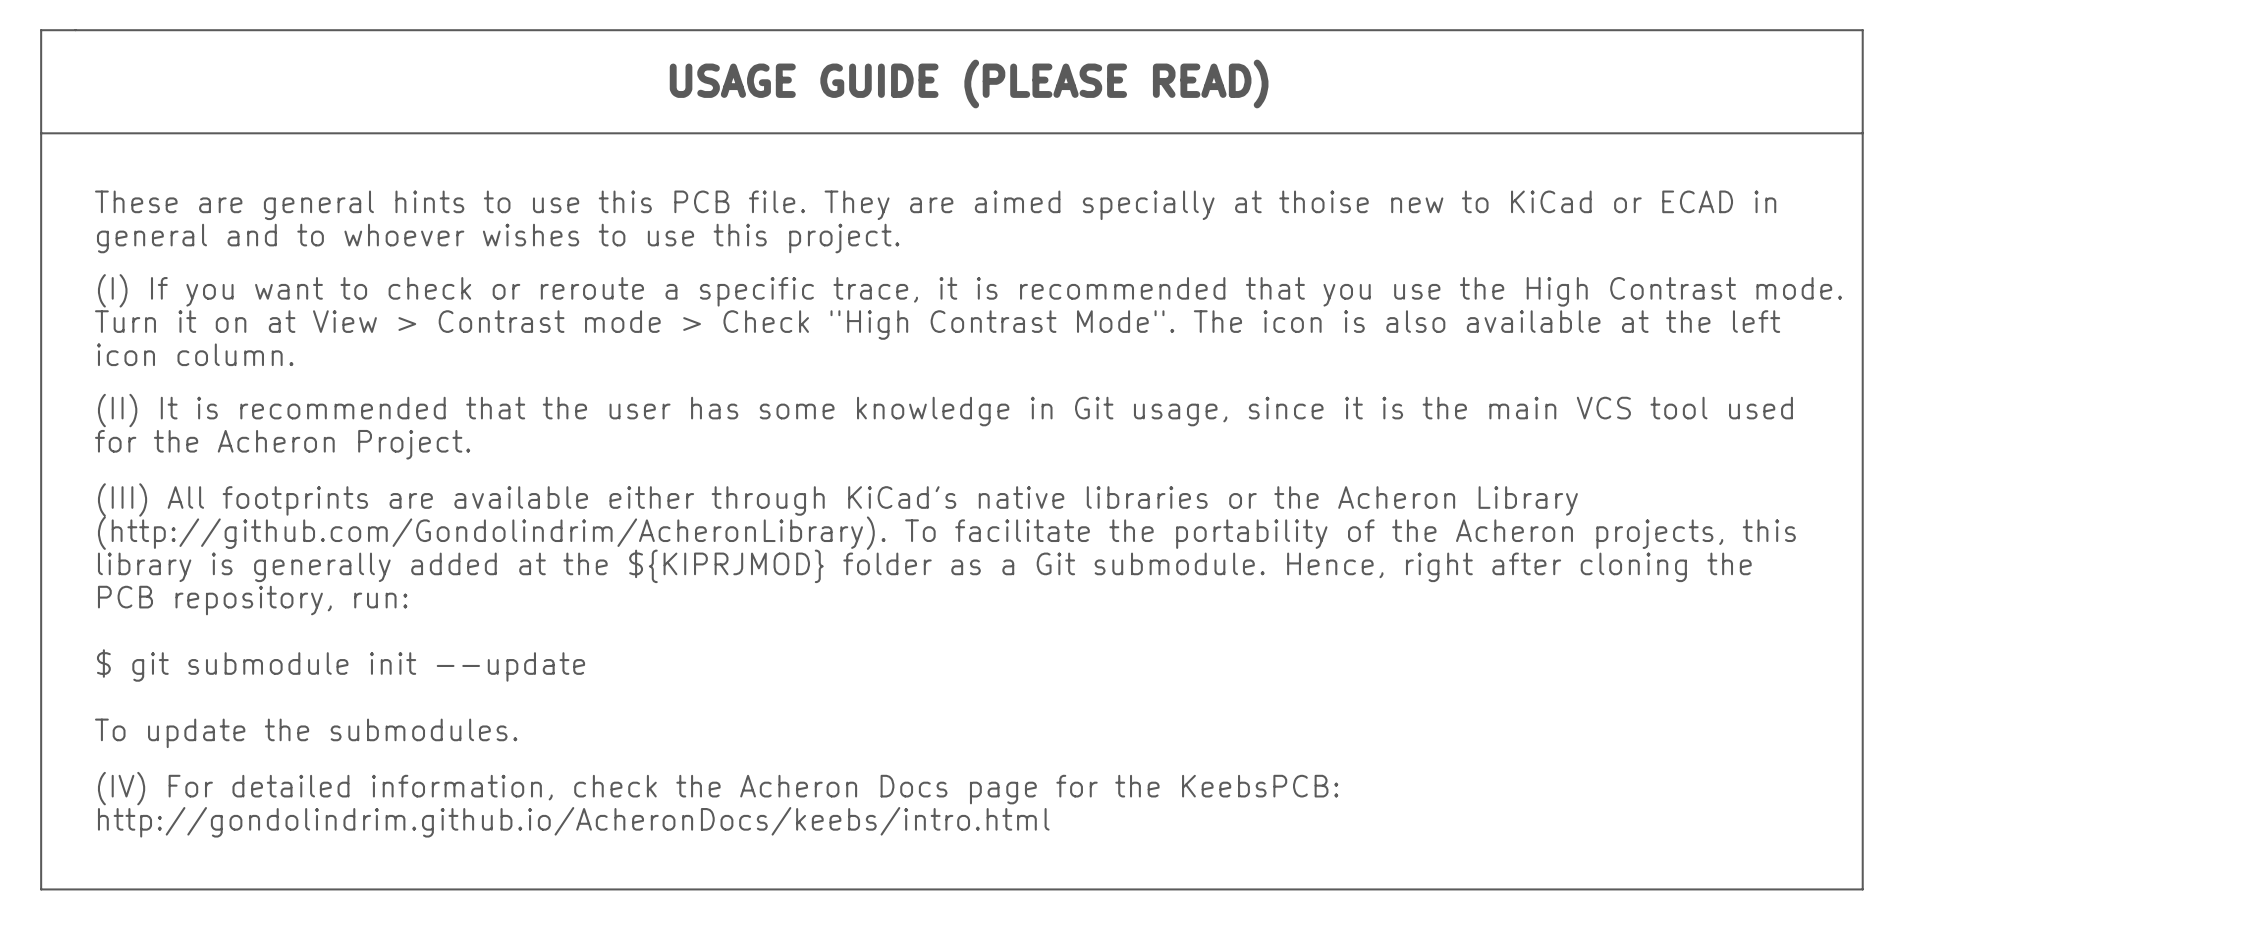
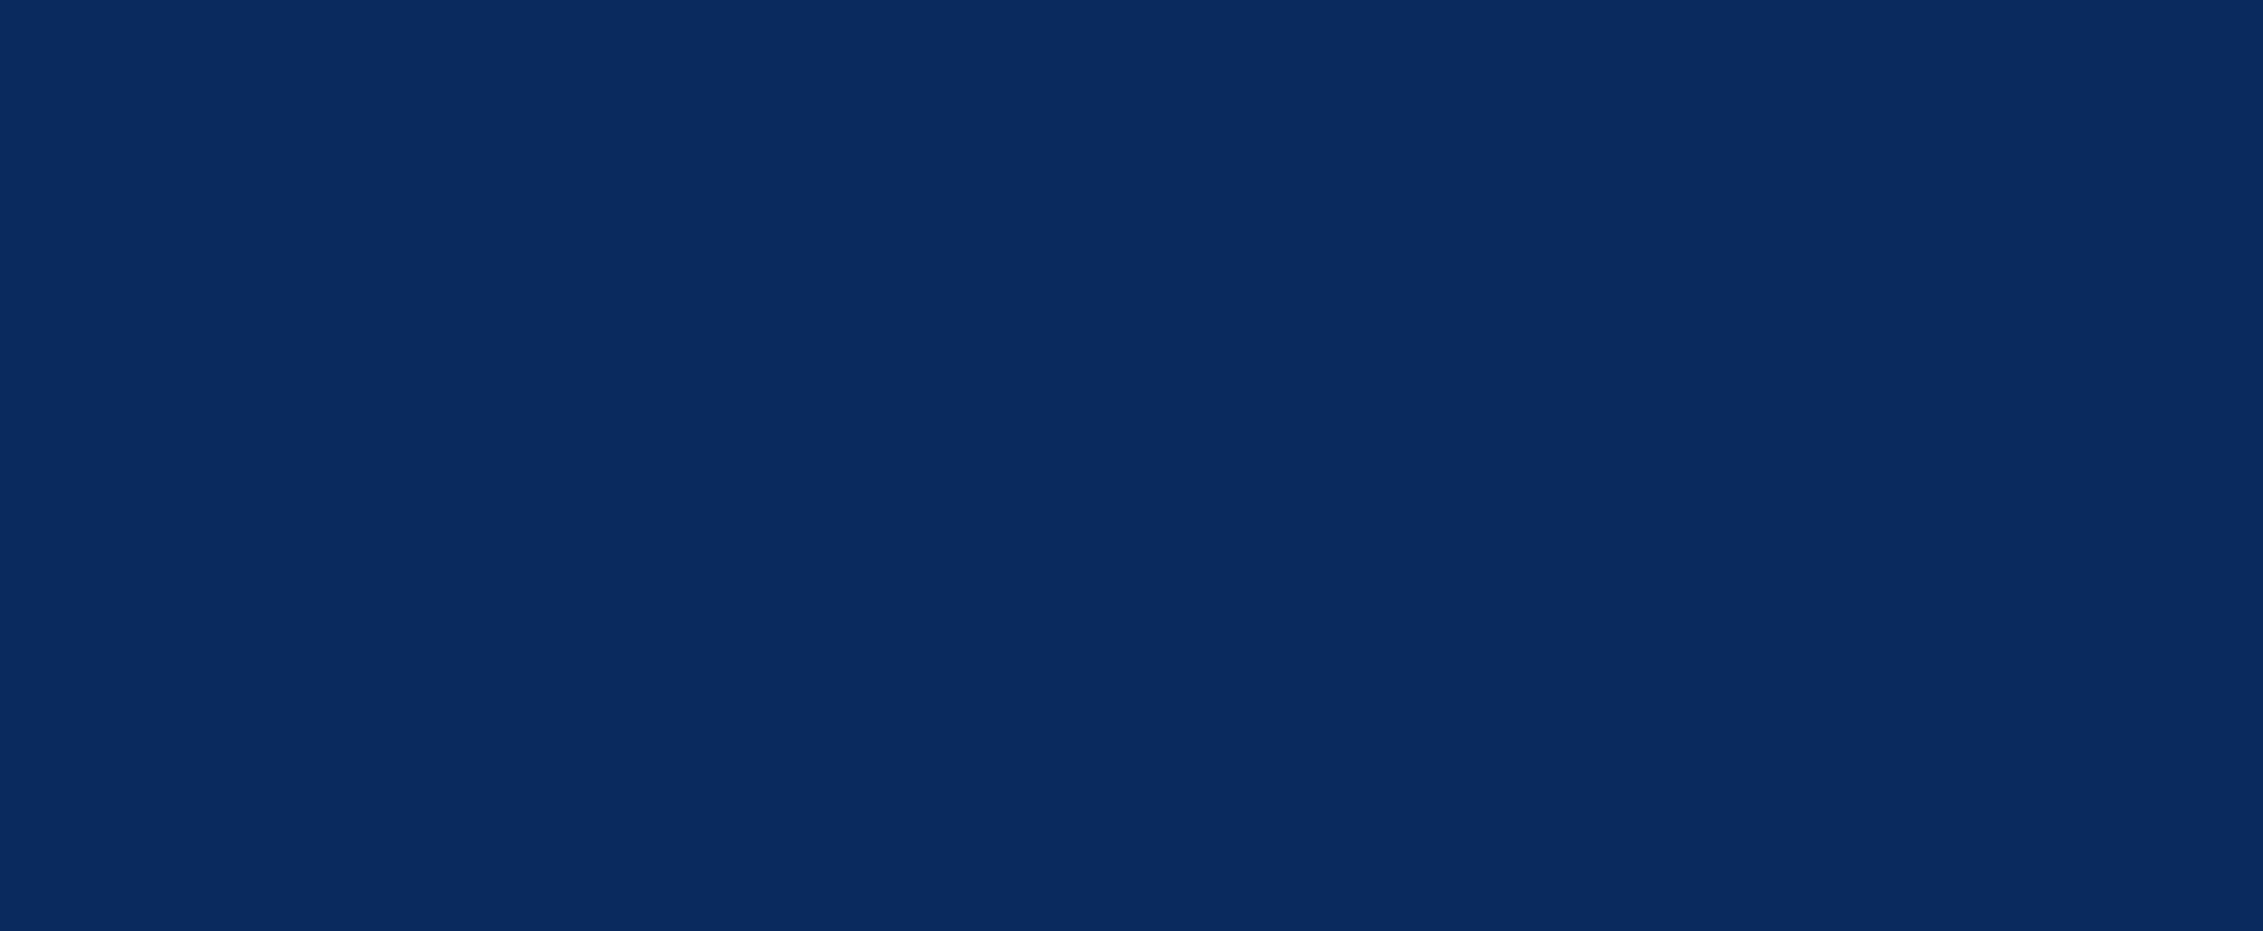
line: (41, 30) (1862, 30) (1862, 889) (41, 889) (41, 30) -> none
text: USAGE GUIDE (PLEASE READ) (969, 84) -> none
line: (41, 133) (1862, 133) -> none
text: These are general hints to use this PCB file. They are aimed specially at thoise new to KiCad or ECAD in (935, 205) -> none
text: general and to whoever wishes to use this project. (498, 238) -> none
text: (I) If you want to check or reroute a specific trace, it is recommended that you use the High Contrast mode. (969, 290) -> none
text: Turn it on at View > Contrast mode > Check "High Contrast Mode". The icon is also available at the left (937, 325) -> none
text: icon column. (195, 354) -> none
text: (II) It is recommended that the user has some knowledge in Git usage, since it is the main VCS tool used (945, 410) -> none
text: for the Acheron Project. (282, 444) -> none
text: (III) All footprints are available either through KiCad's native libraries or the Acheron Library (837, 499) -> none
text: (http://github.com/Gondolindrim/AcheronLibrary). To facilitate the portability of the Acheron projects, this (946, 533) -> none
text: library is generally added at the ${KIPRJMOD} folder as a Git submodule. Hence, right after cloning the (924, 566) -> none
text: PCB repository, run: (252, 600) -> none
text: $ git submodule init --update (341, 665) -> none
text: To update the submodules. (306, 733) -> none
text: (IV) For detailed information, check the Acheron Docs page for the KeebsPCB: (718, 788) -> none
text: http://gondolindrim.github.io/AcheronDocs/keebs/intro.html (573, 822) -> none

